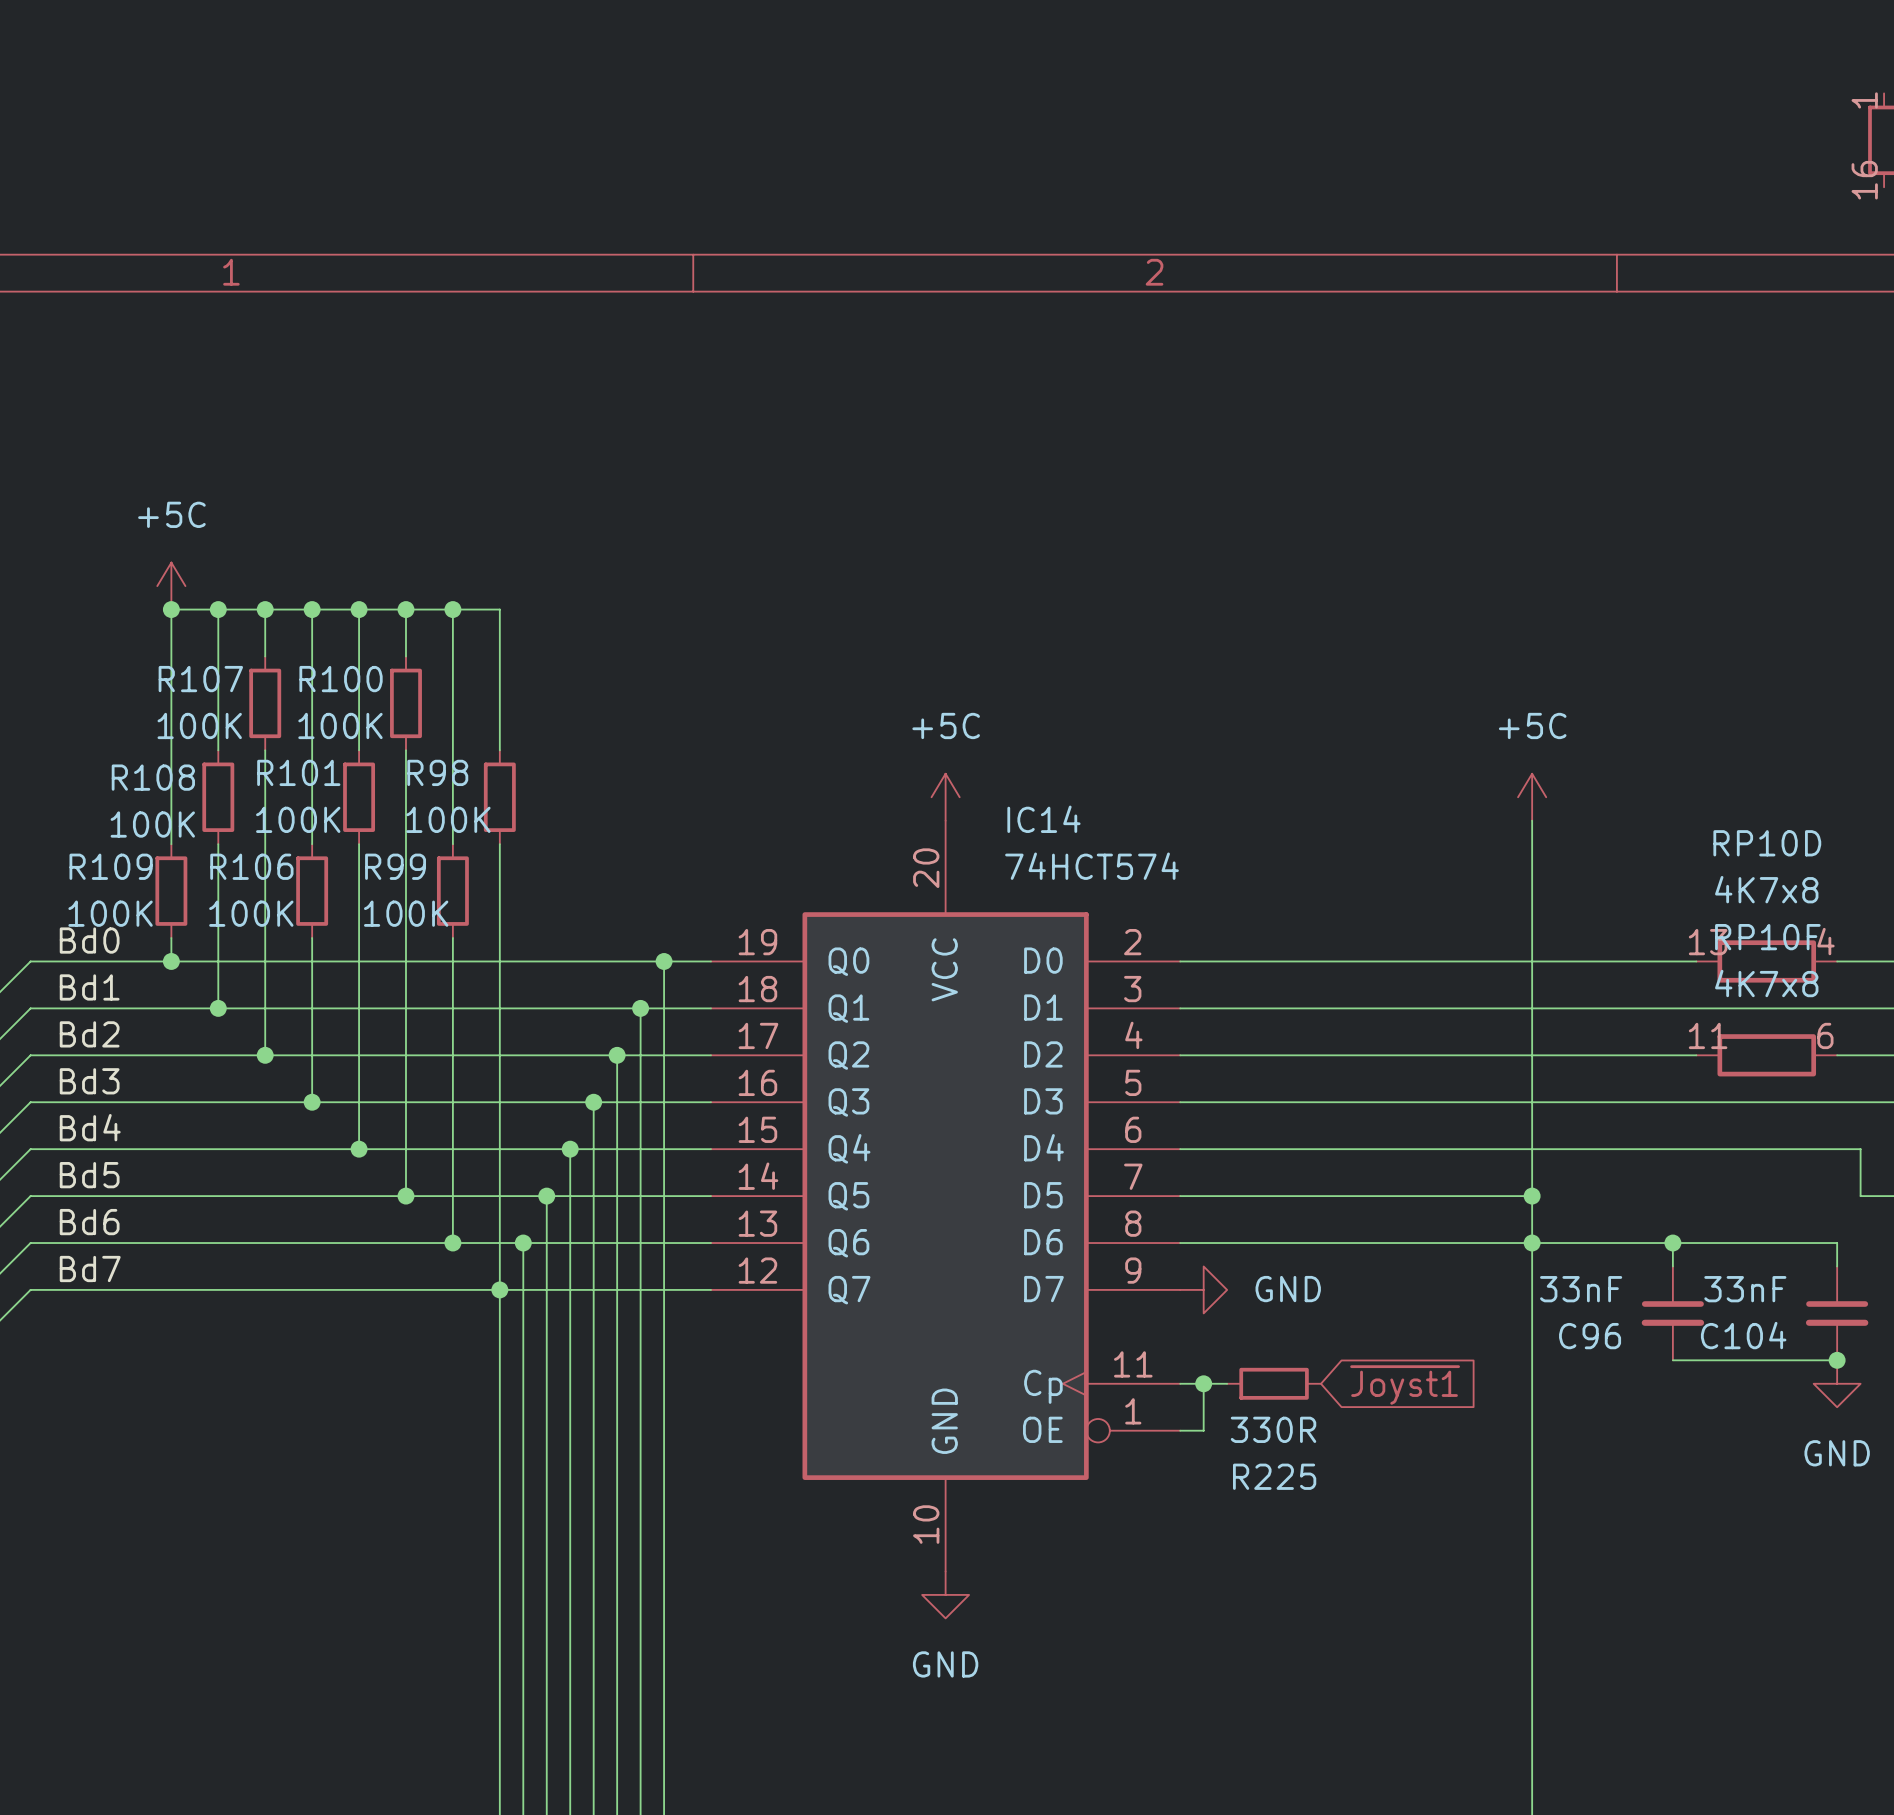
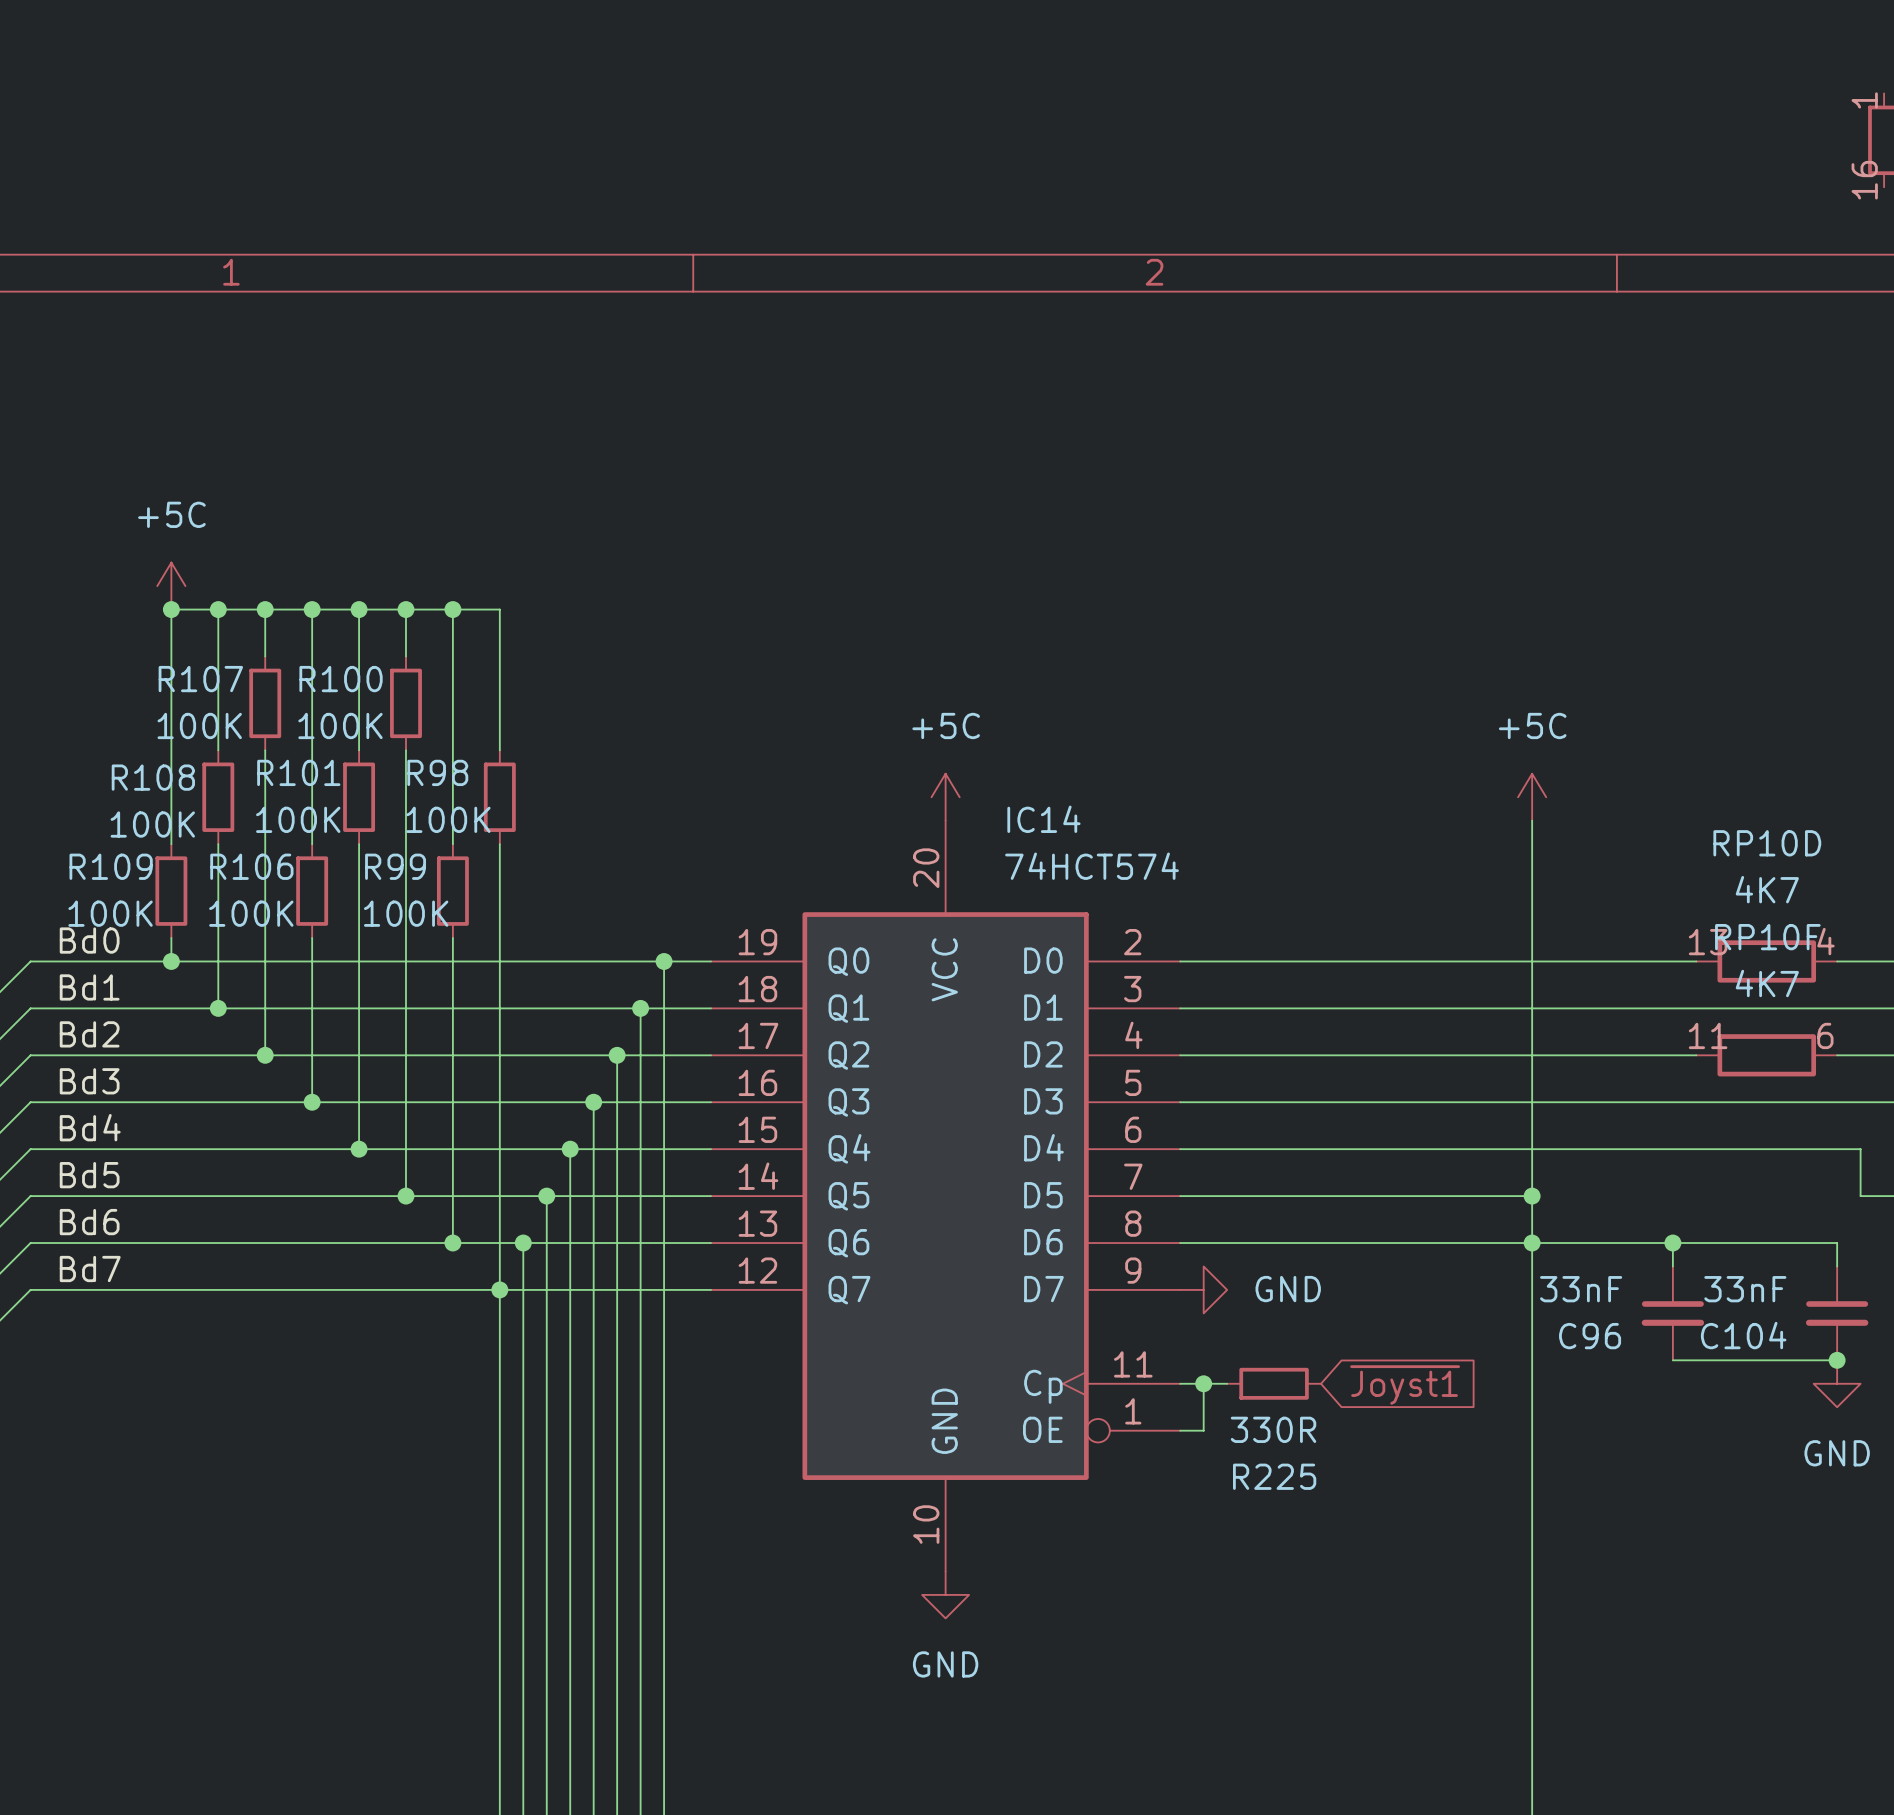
RP10D value: 4K7x8 (1766, 889) -> 4K7 (1767, 889)
RP10F value: 4K7x8 (1766, 983) -> 4K7 (1767, 983)

